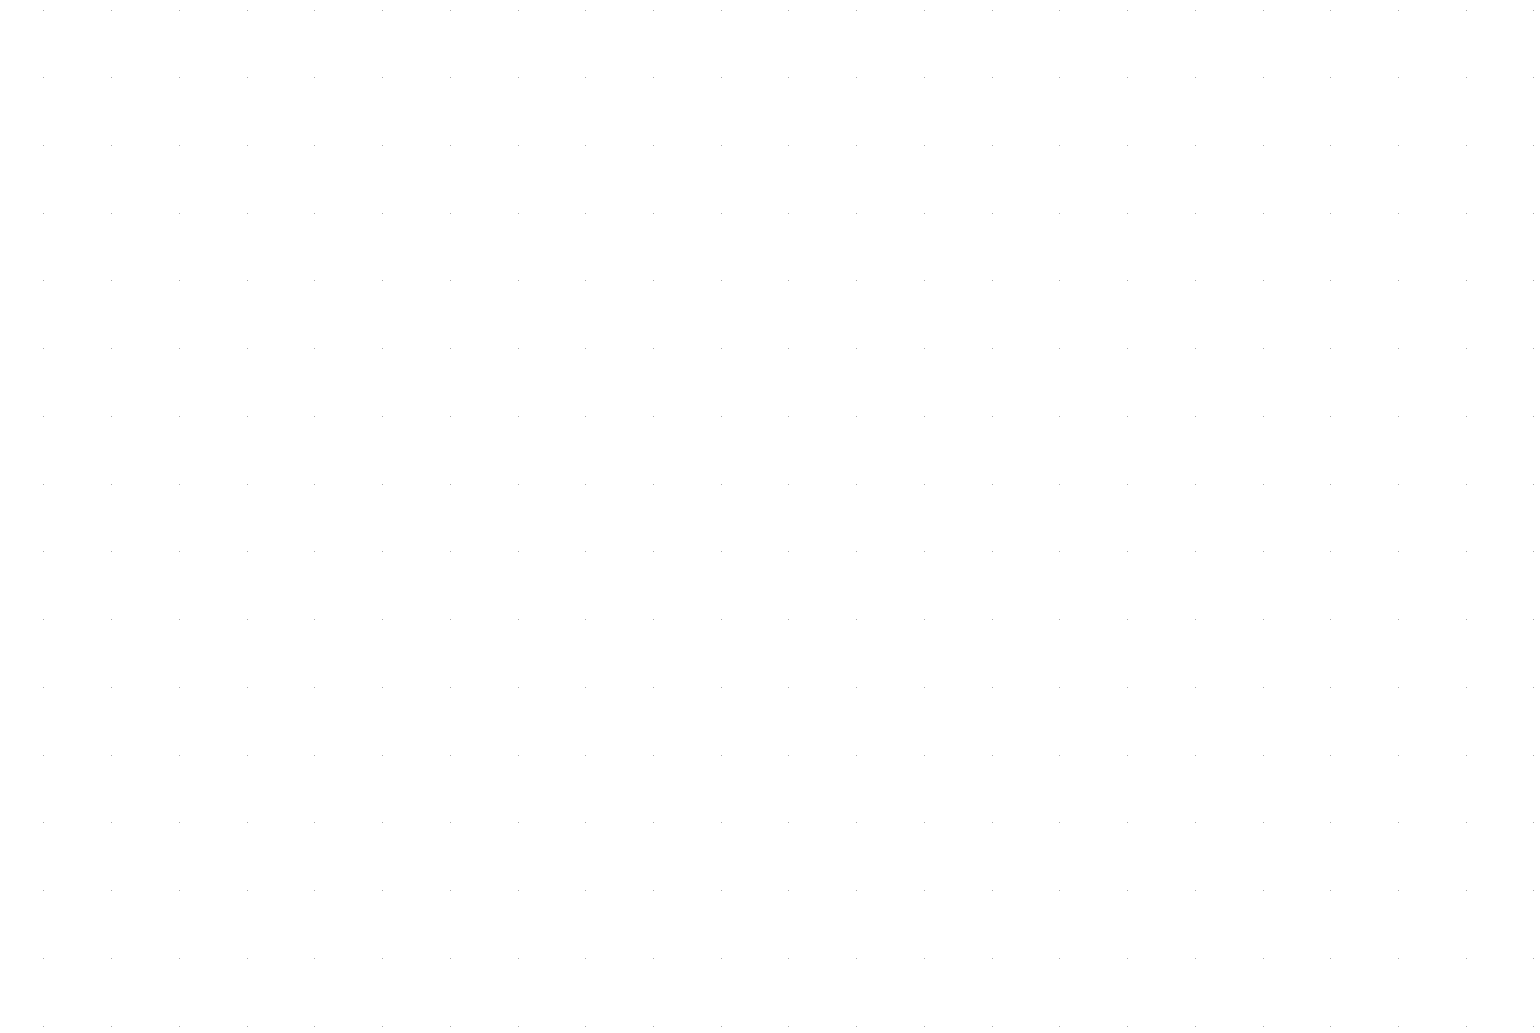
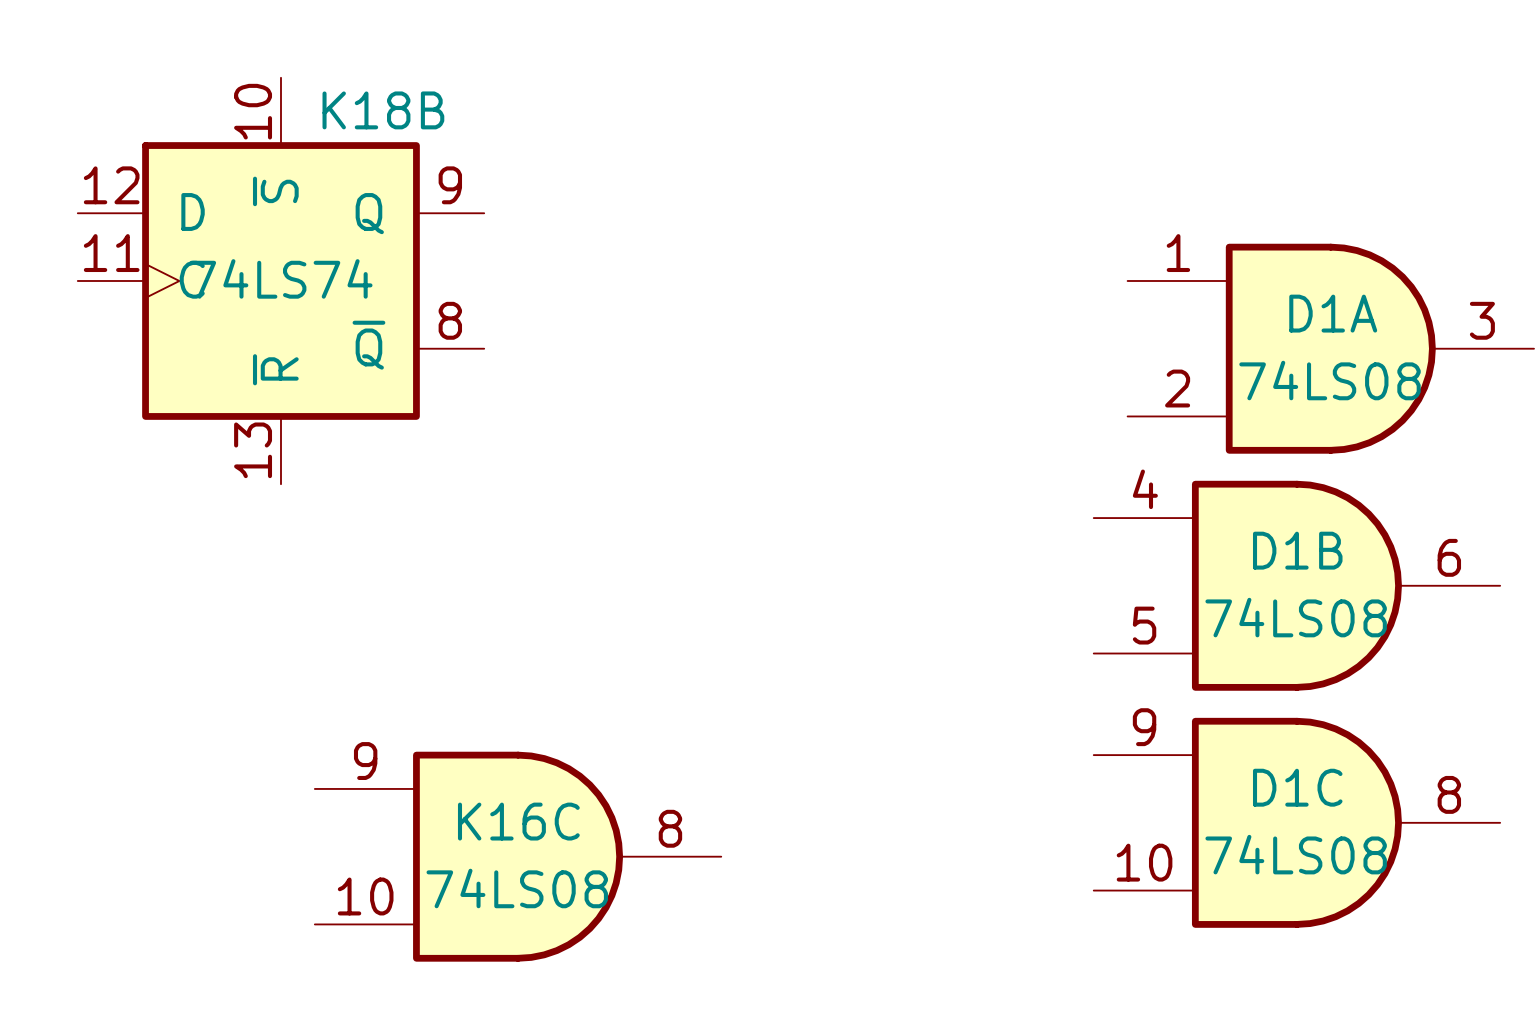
K18B: none -> 74LS74 (280, 280)
D1A: none -> 74LS08 (1330, 348)
D1B: none -> 74LS08 (1296, 585)
D1C: none -> 74LS08 (1296, 822)
K16C: none -> 74LS08 (518, 856)

